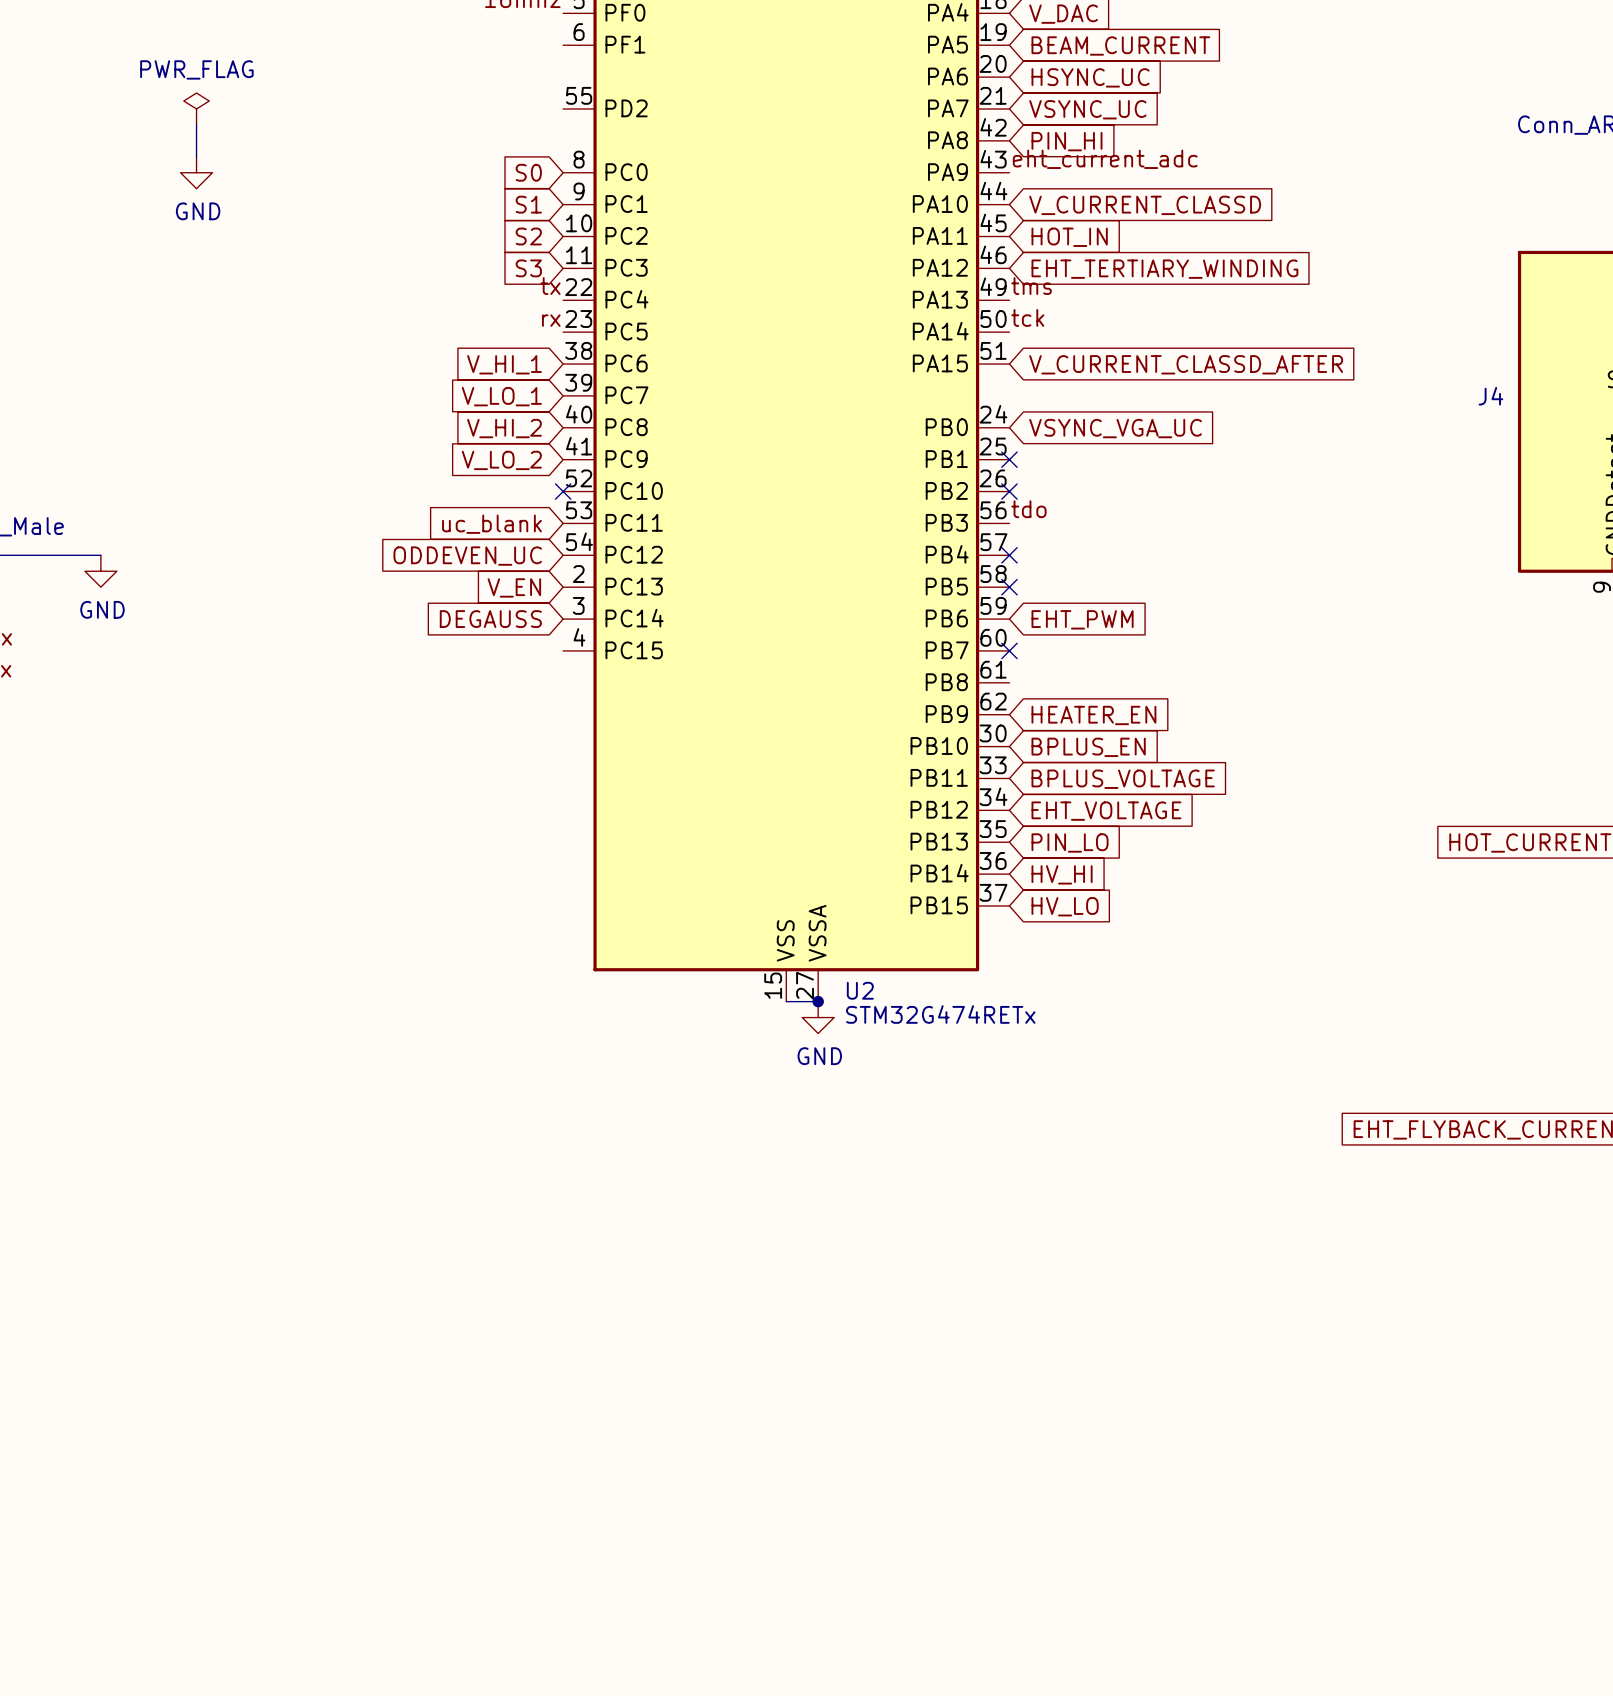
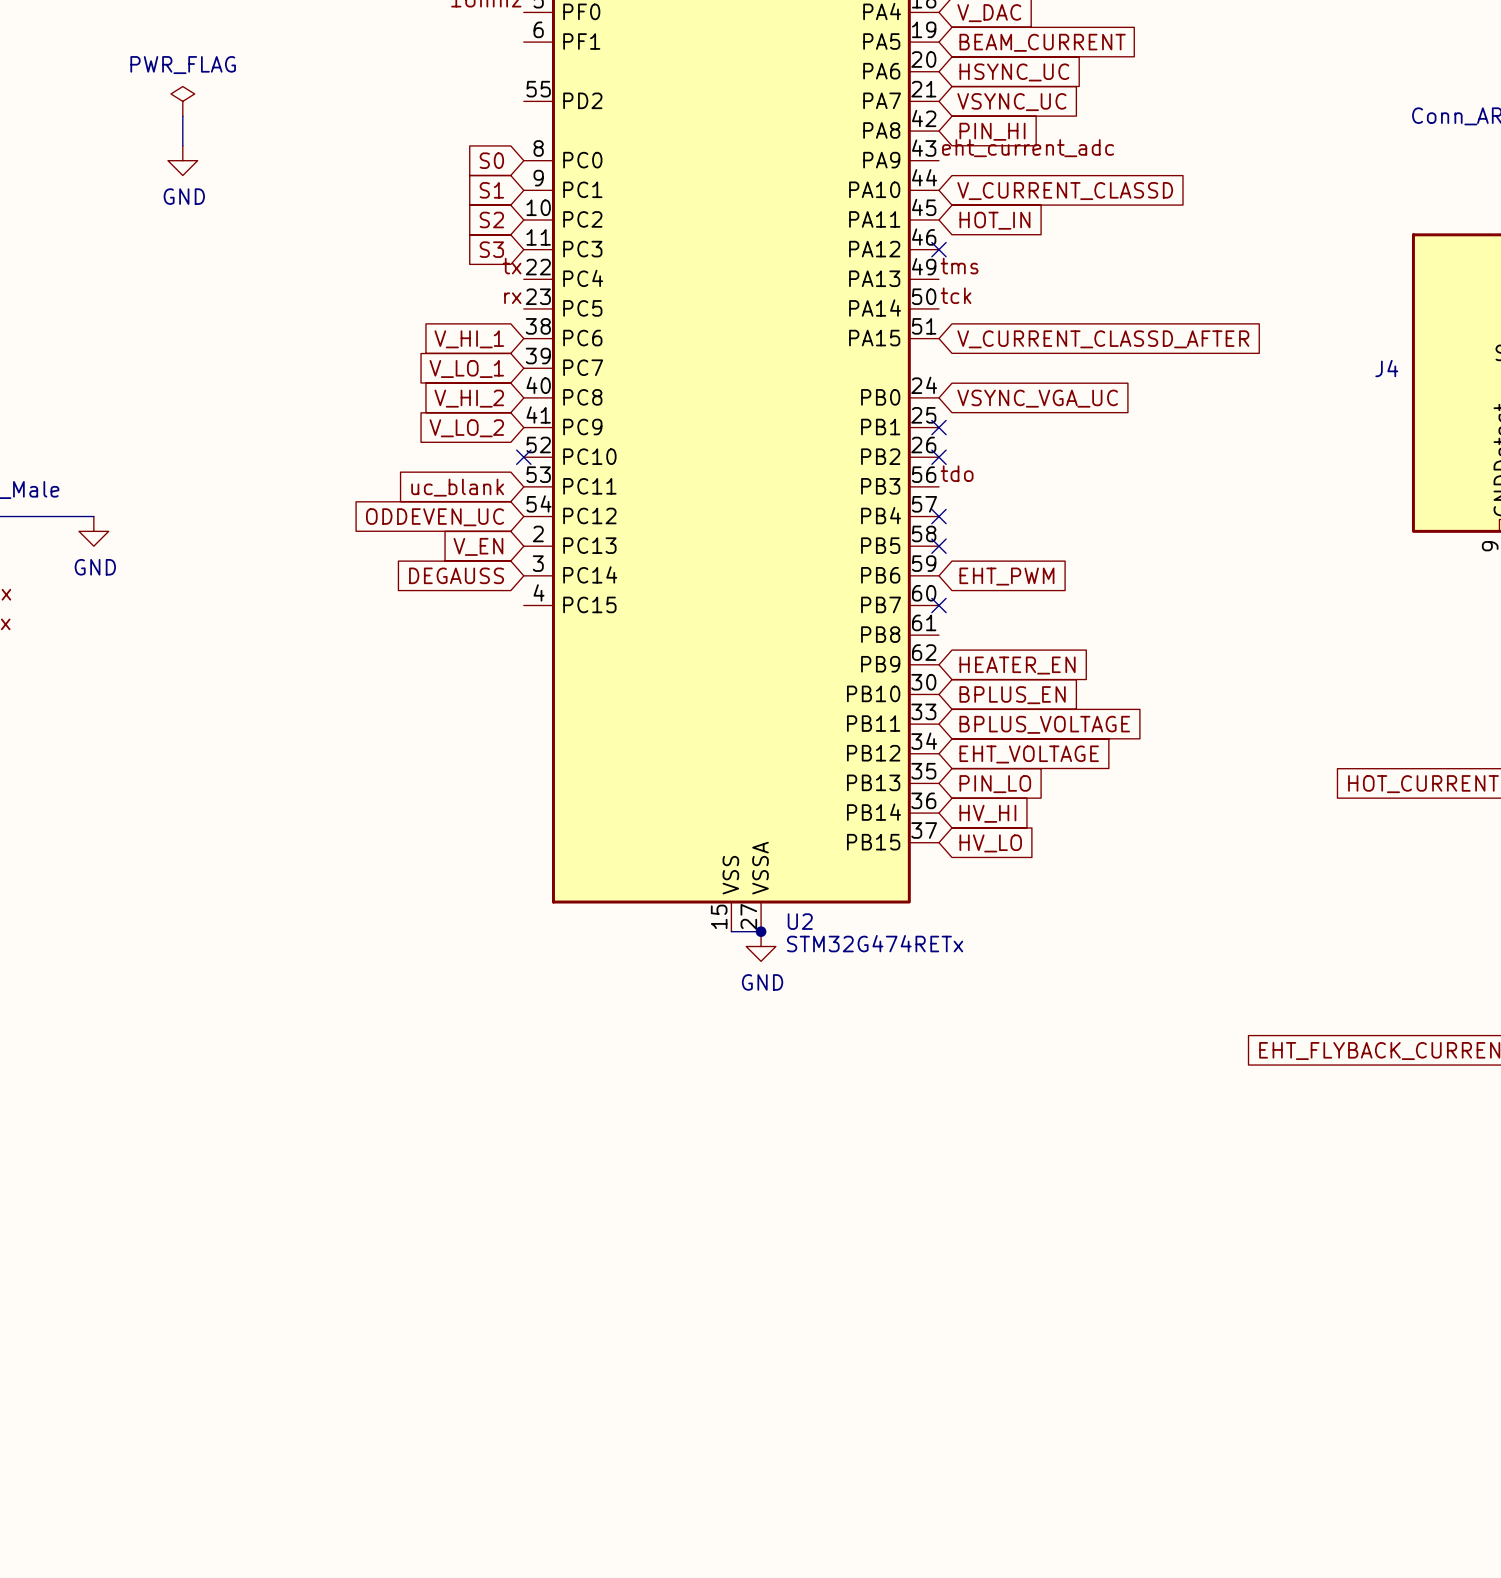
no-connect mark: none -> (938, 249)
global label: EHT_TERTIARY_WINDING (1164, 269) -> none

